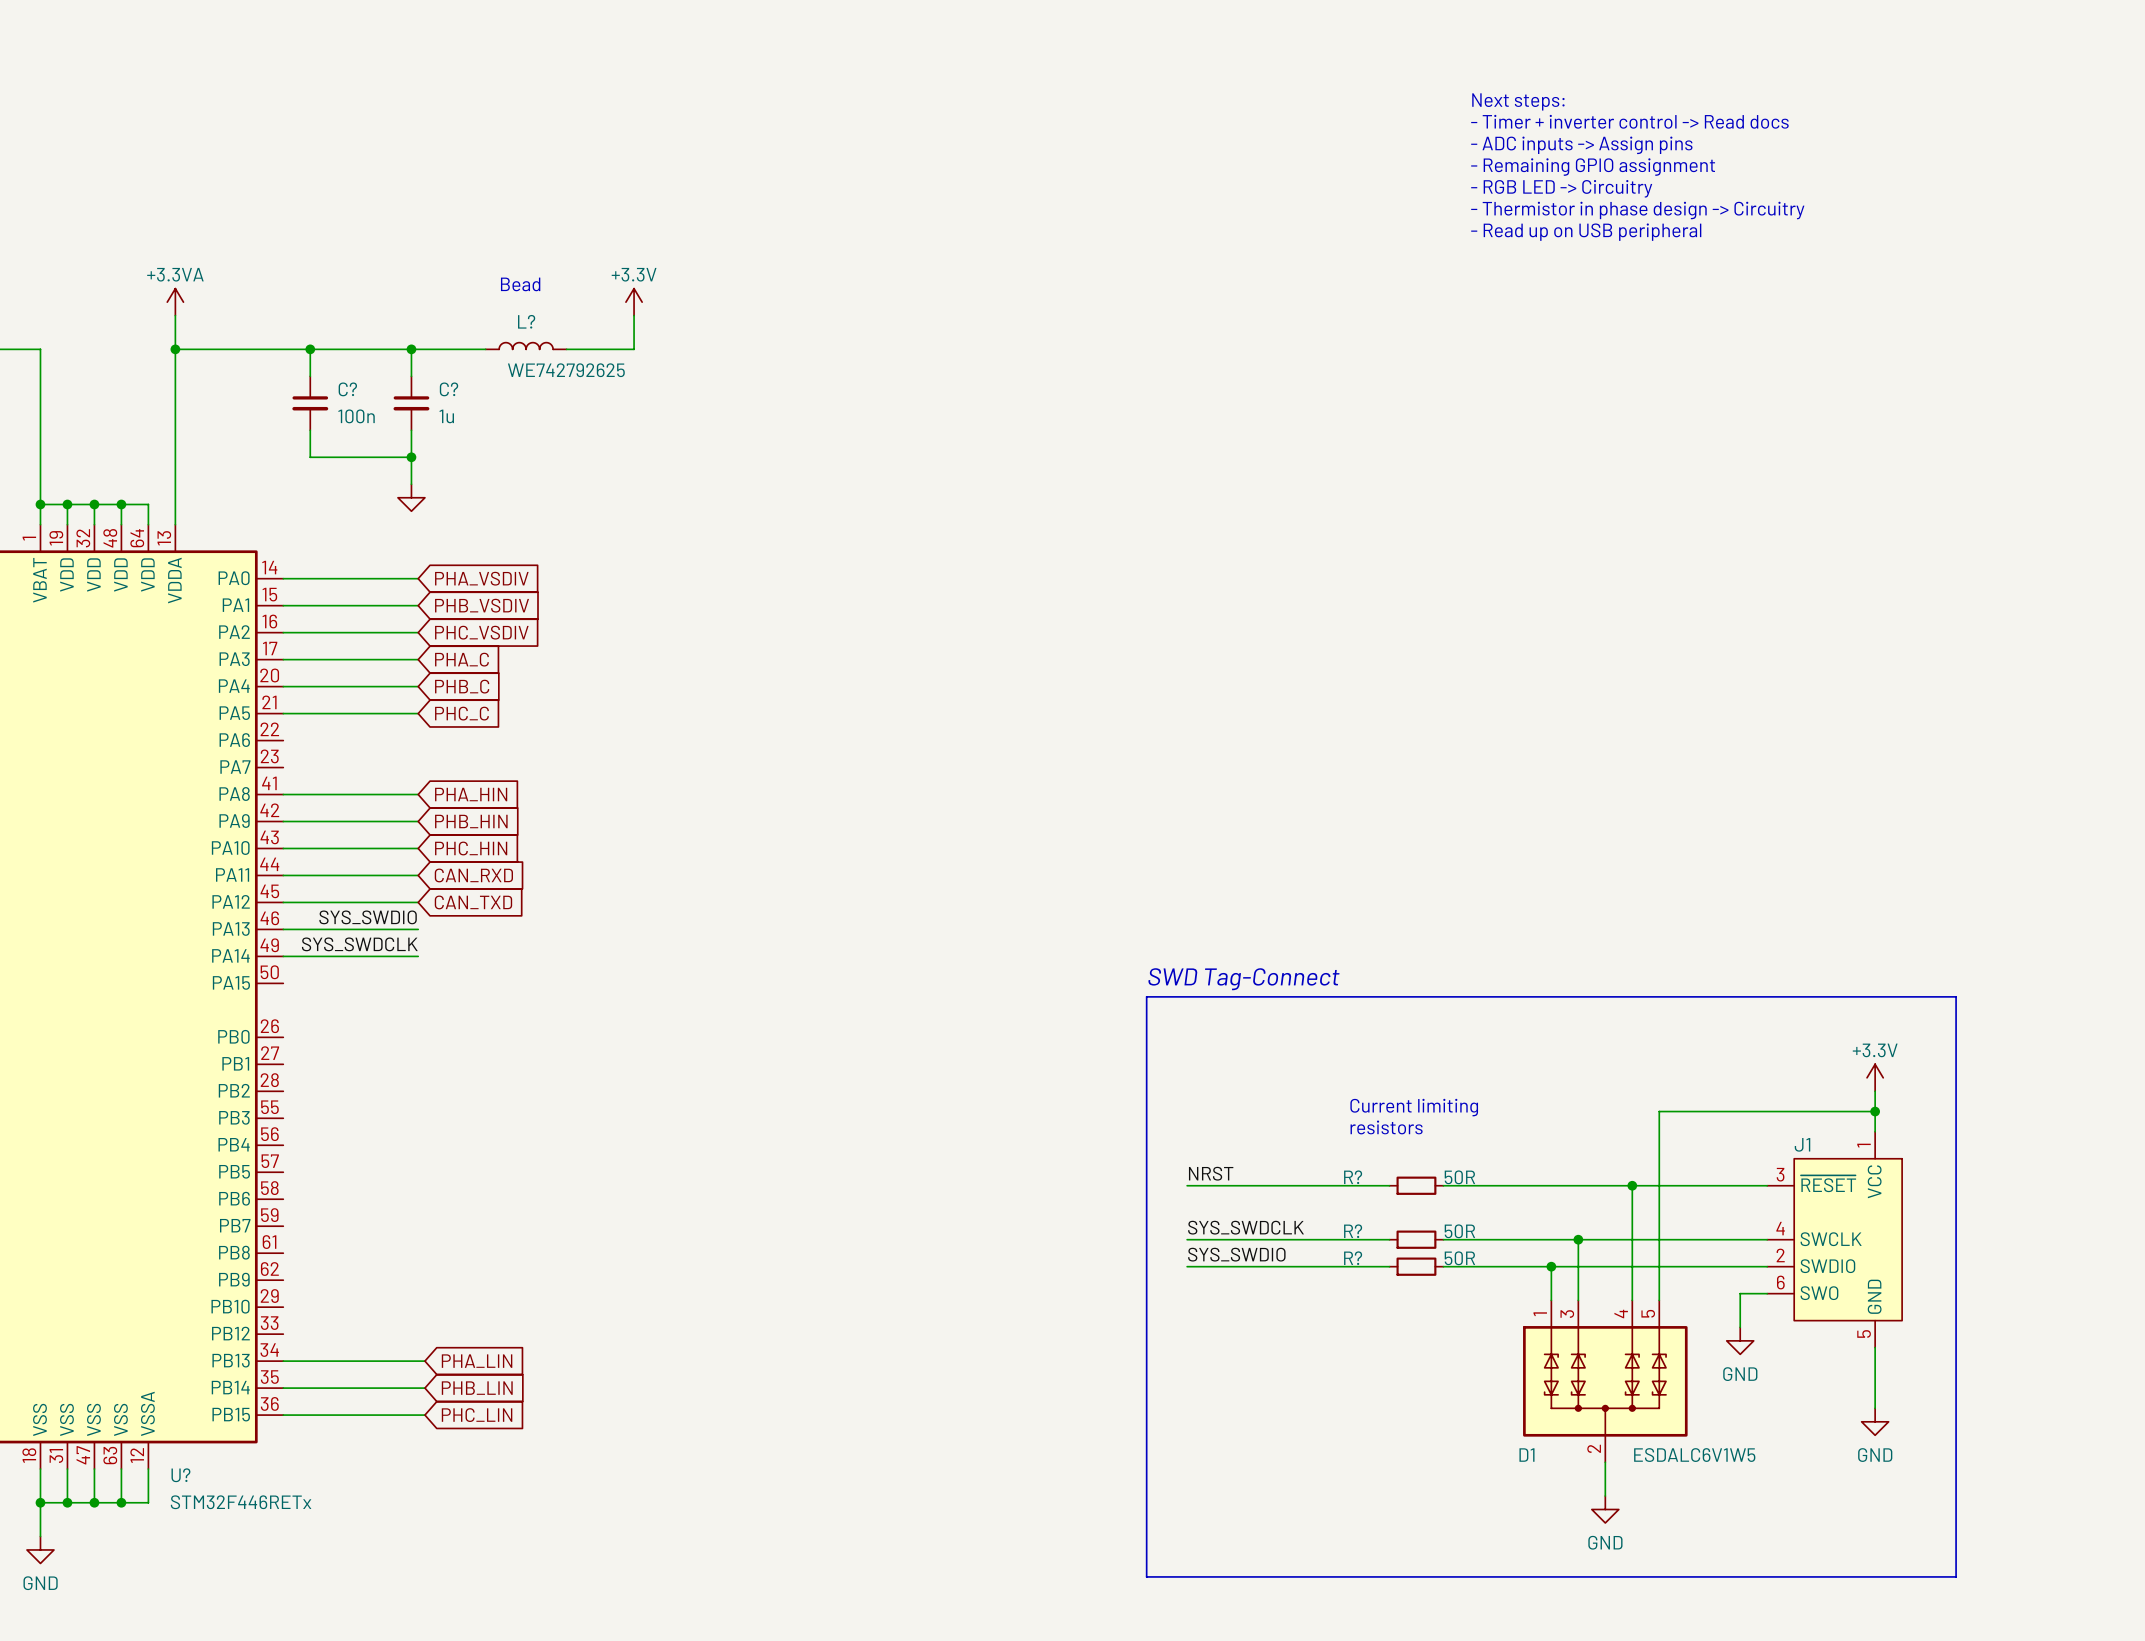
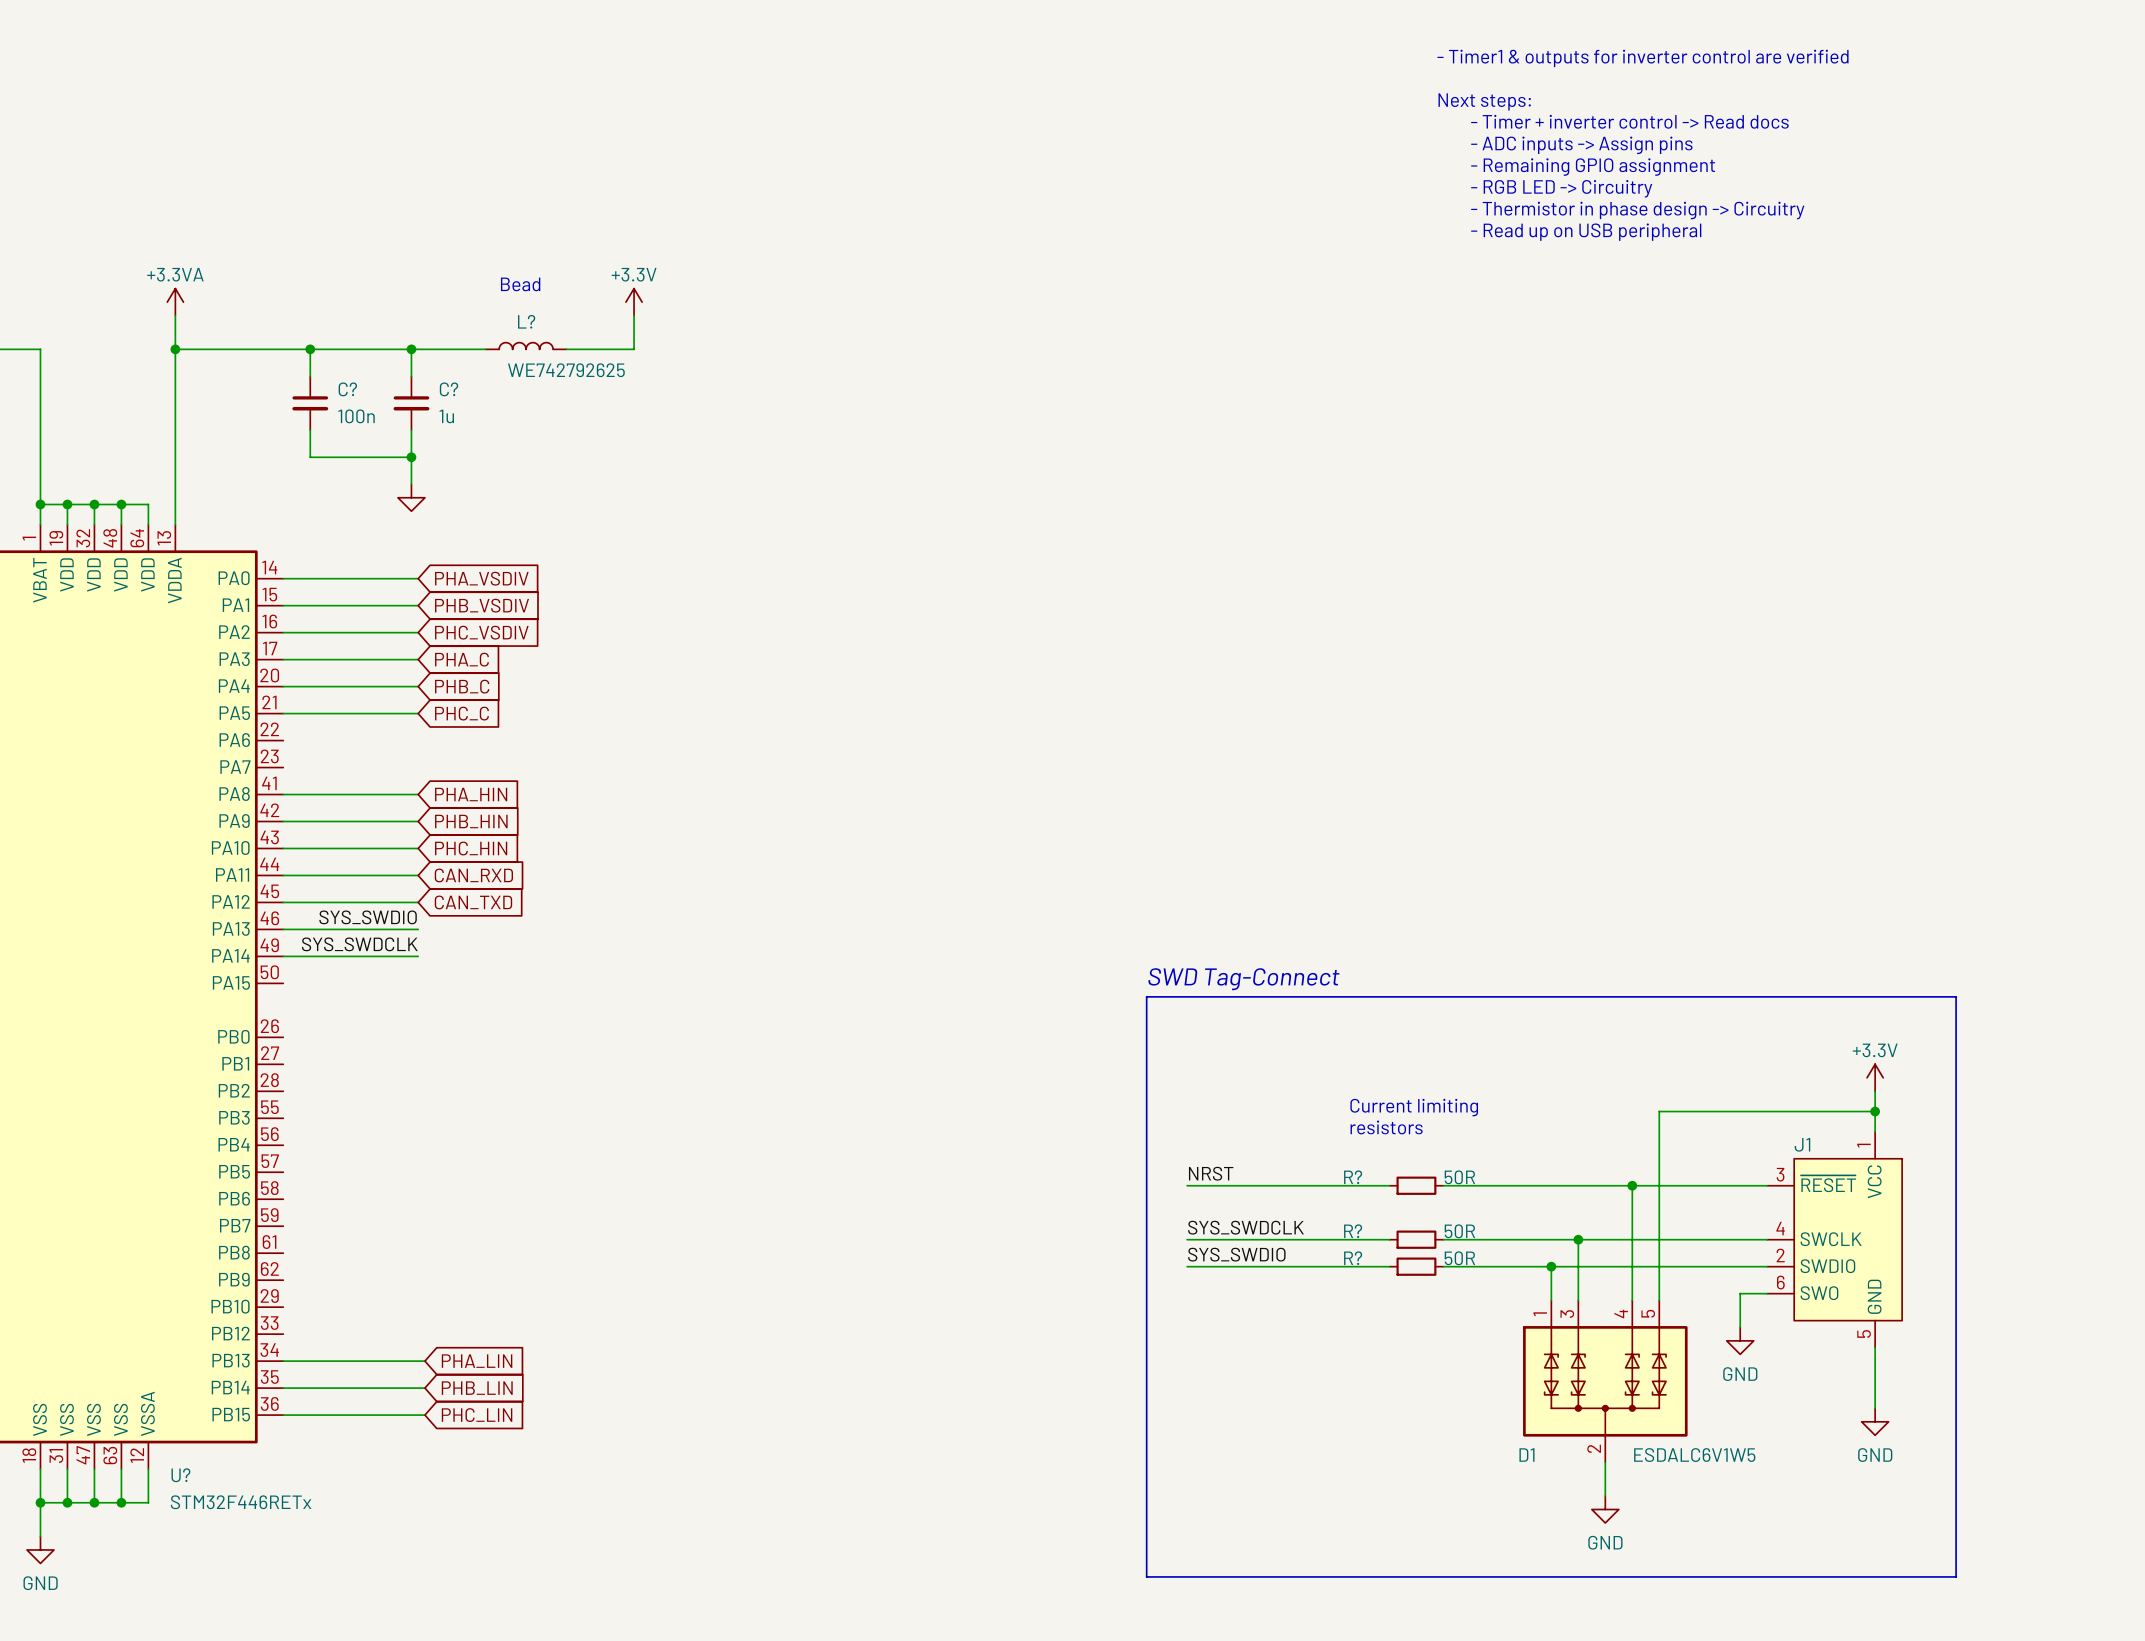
text: none -> - Timer1 & outputs for inverter control are verified (1643, 58)
text position: Next steps: (1518, 101) -> Next steps: (1484, 101)

